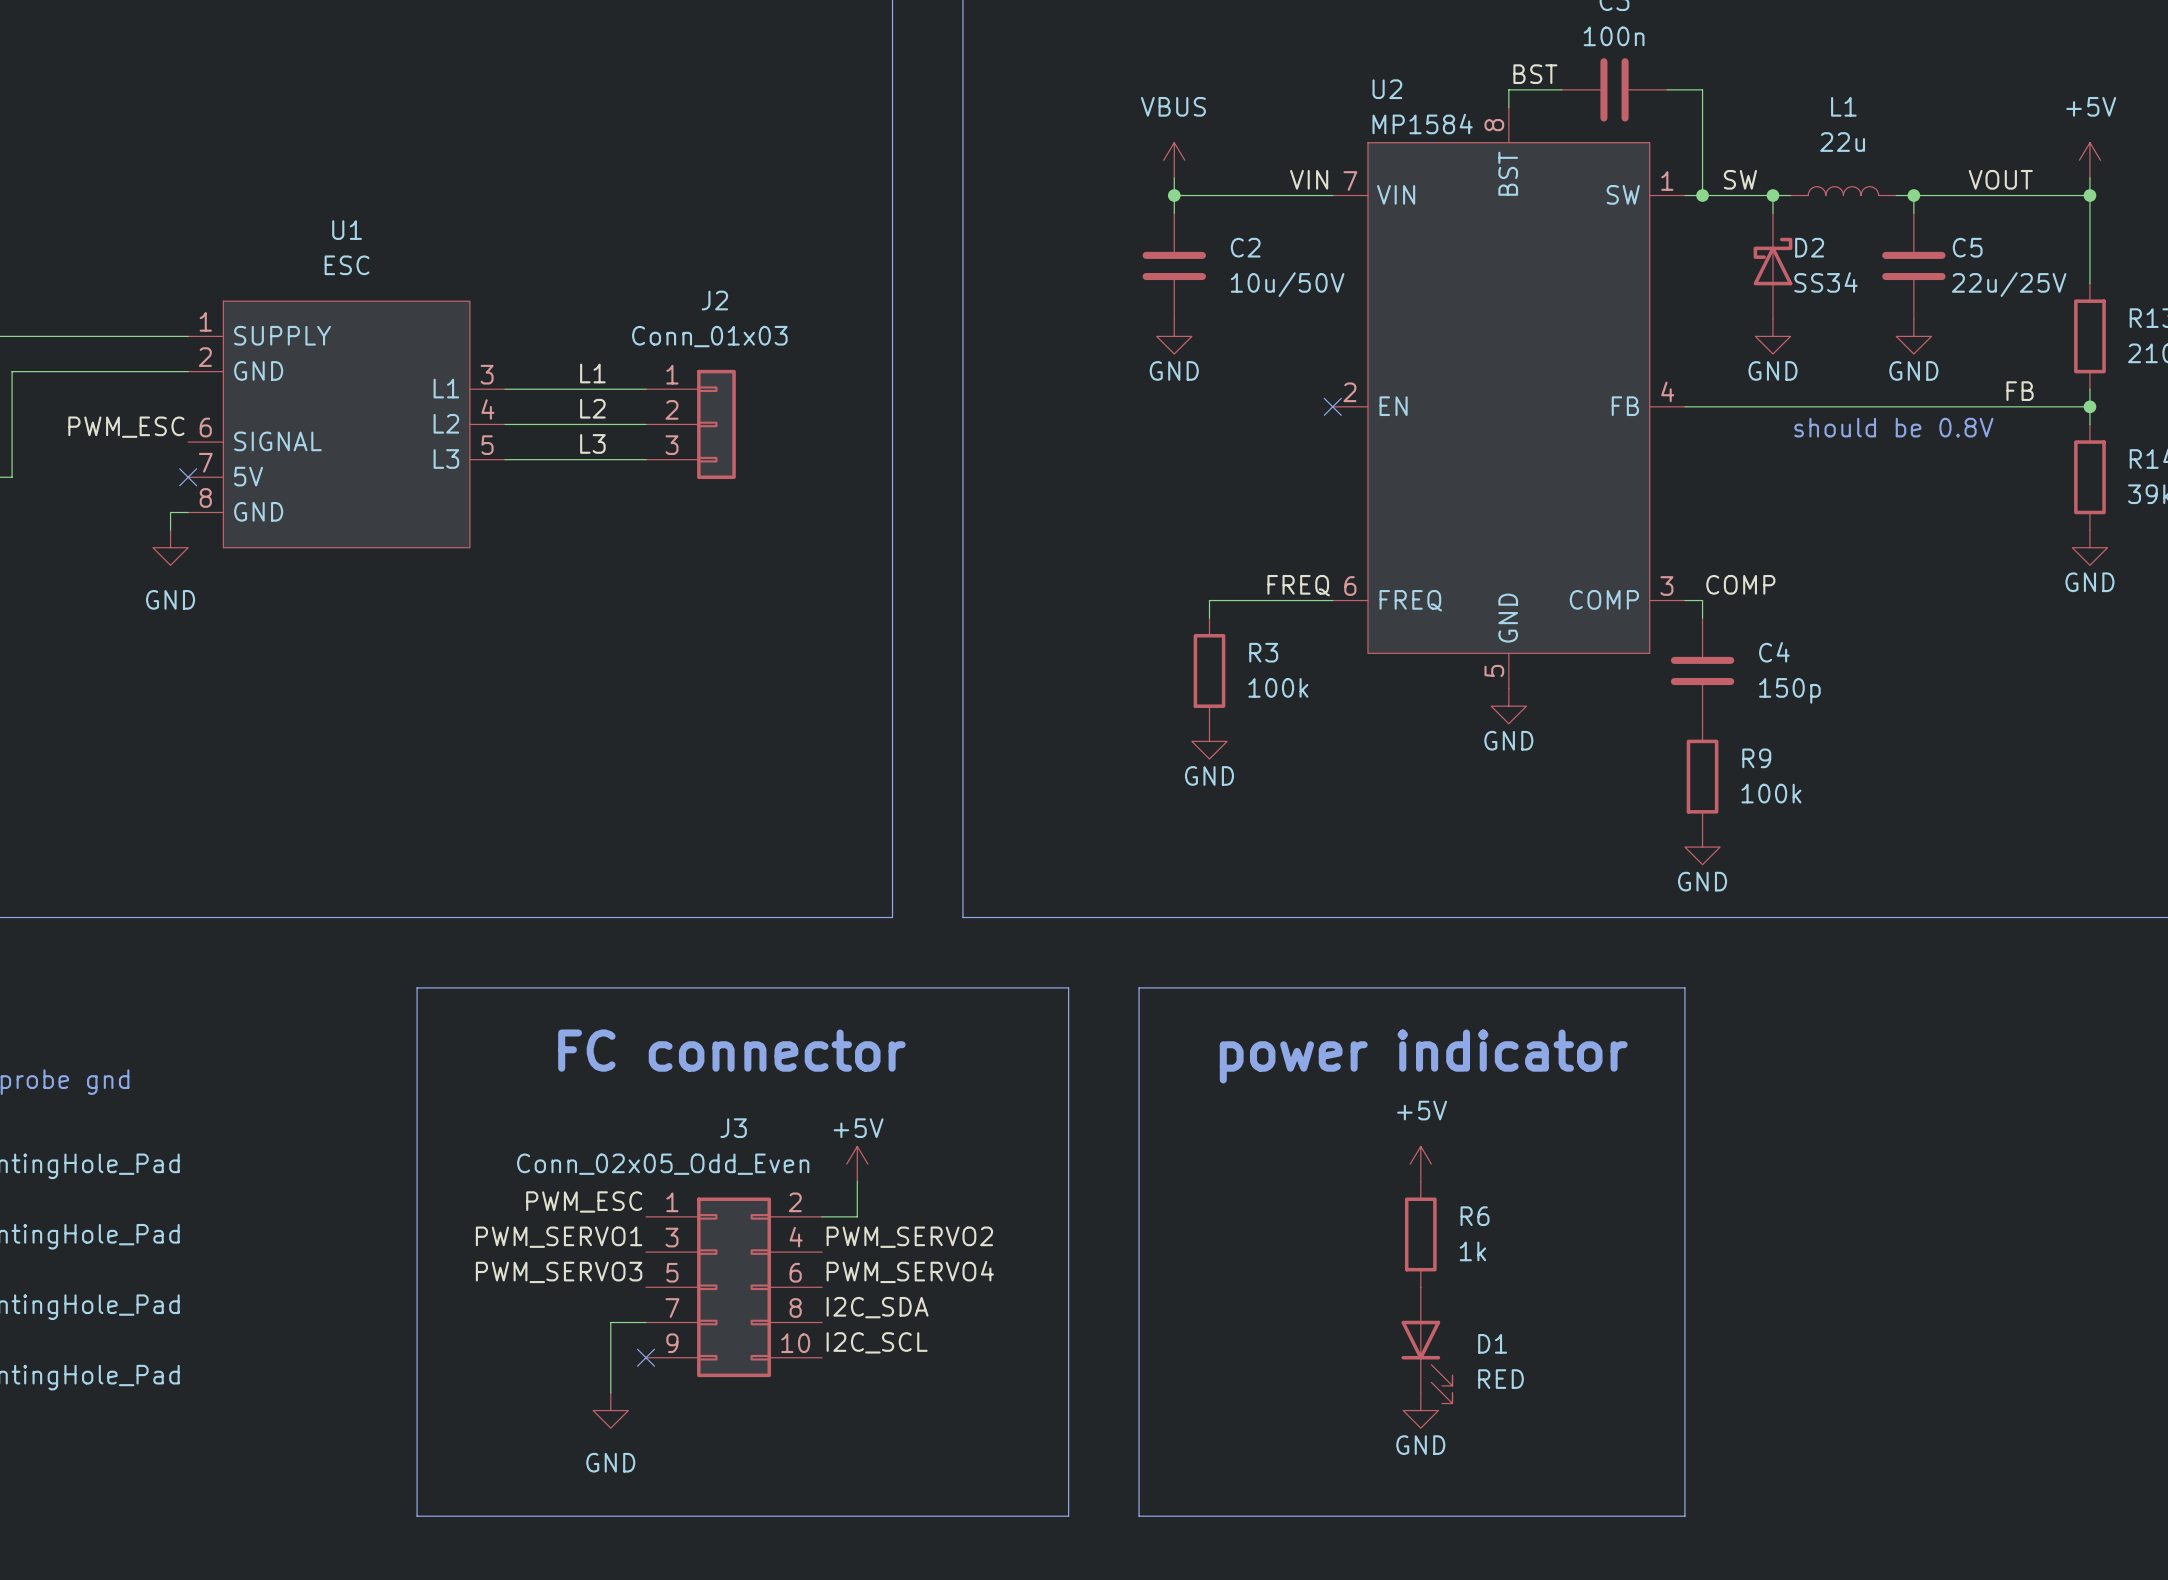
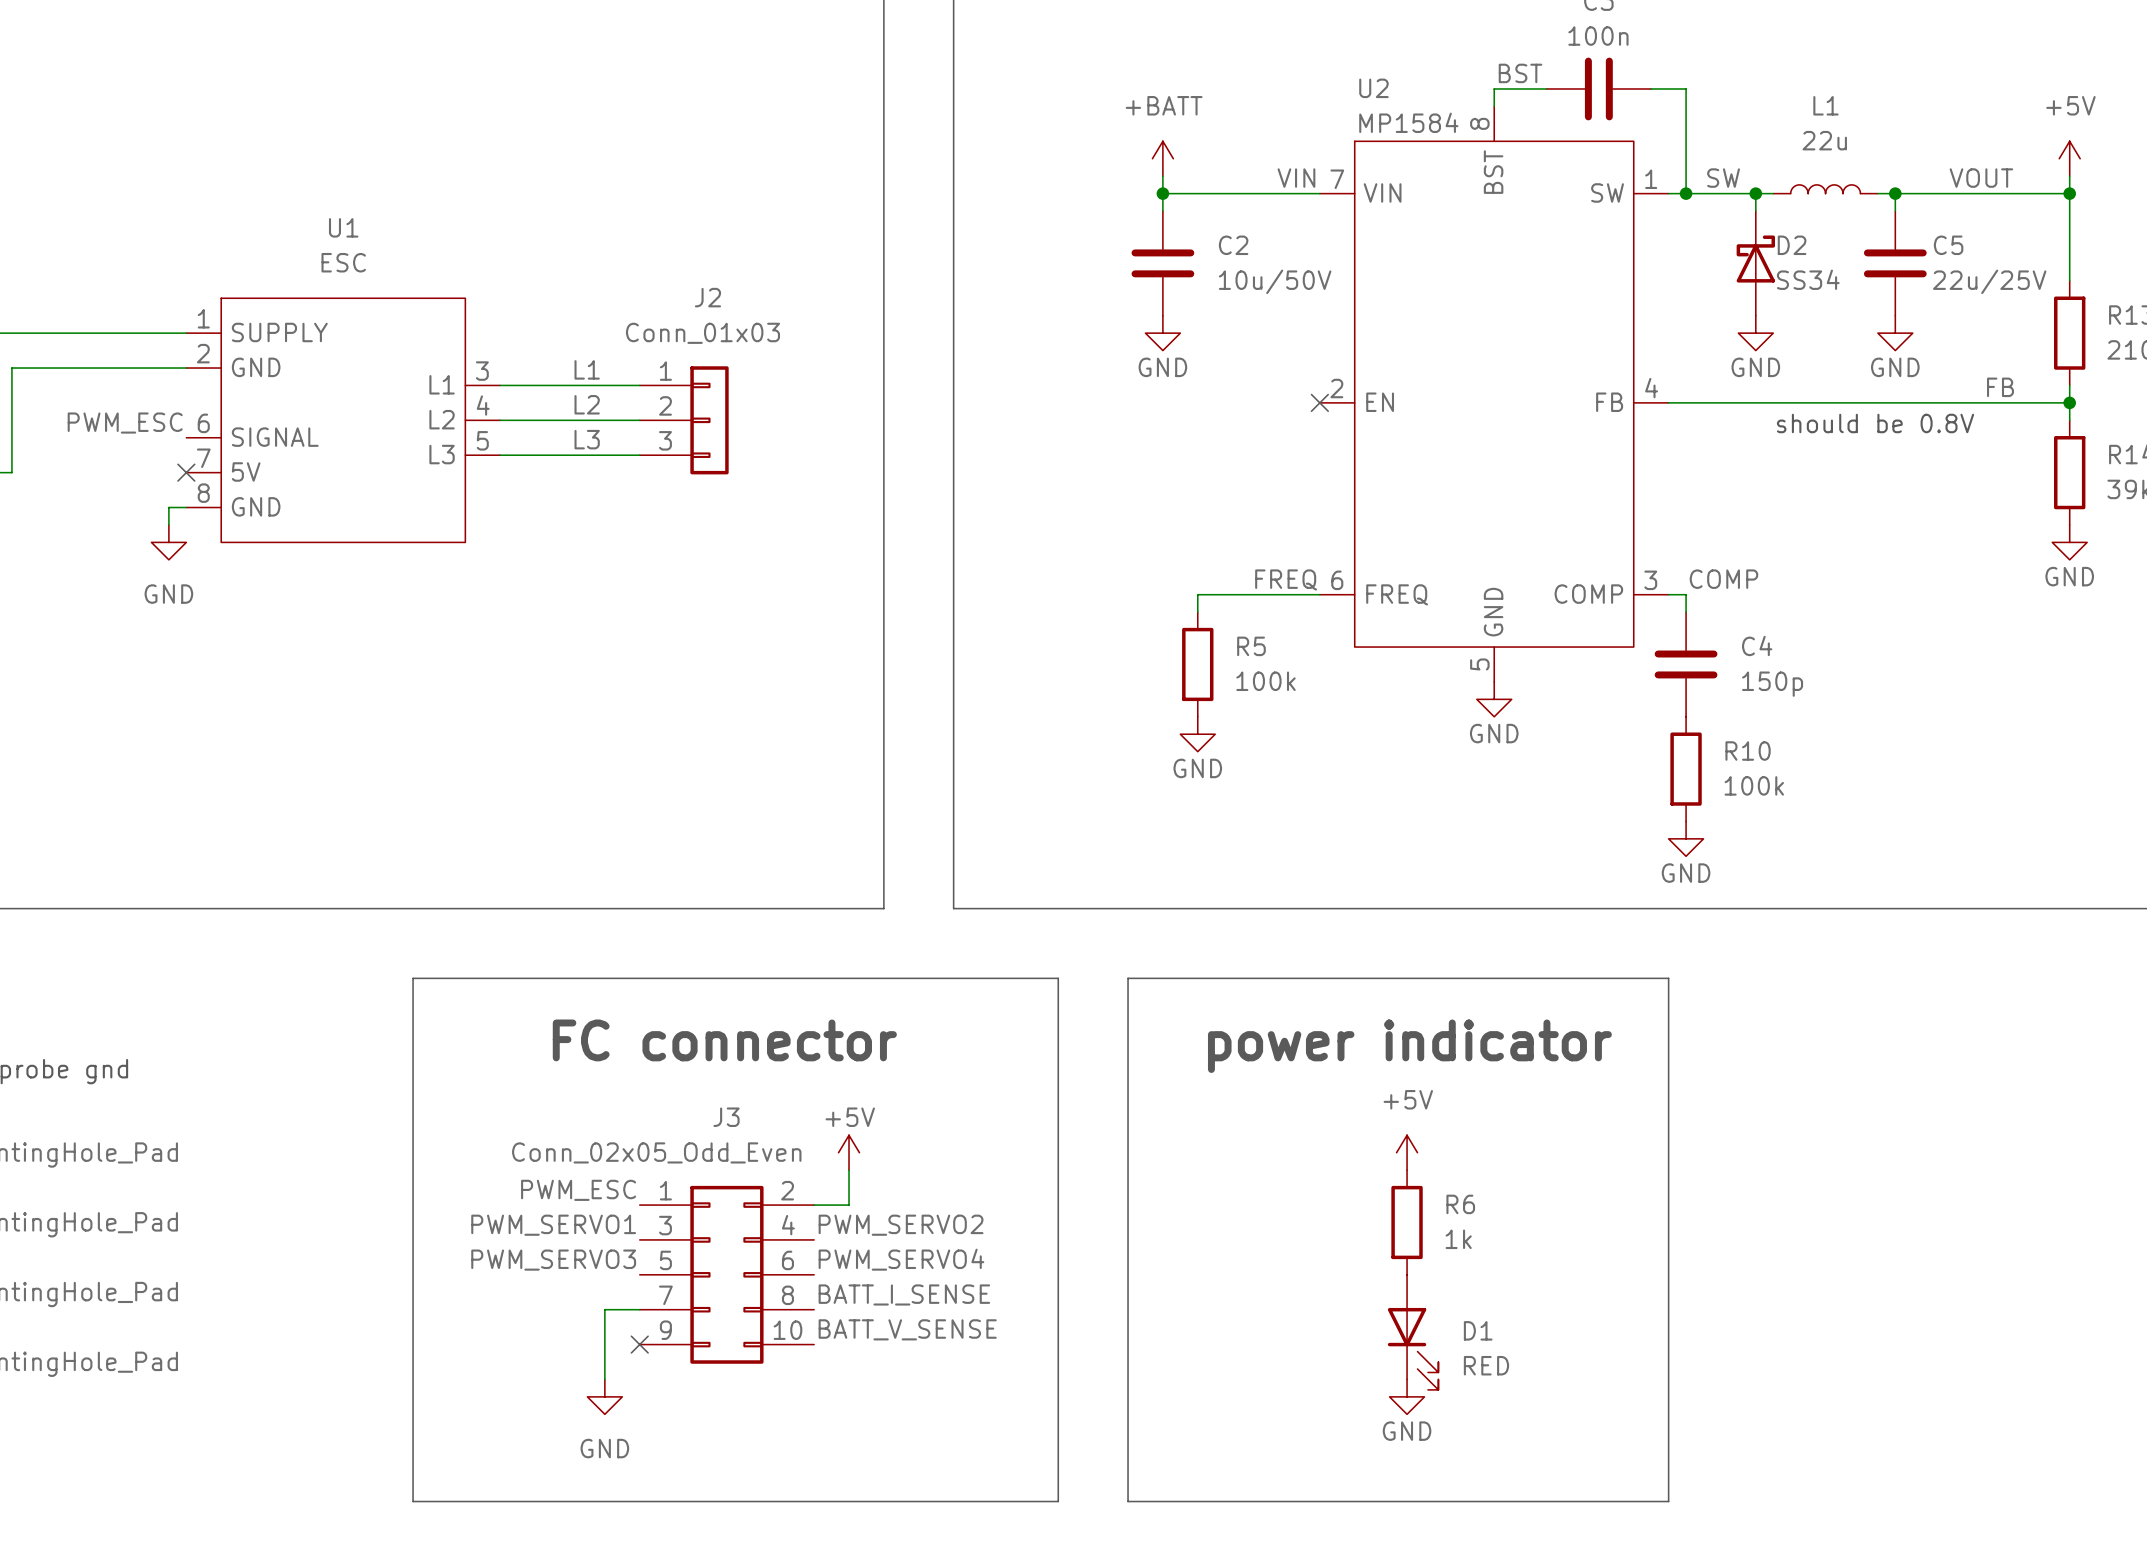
power symbol: VBUS (1174, 160) -> +BATT (1162, 158)
R3 name: R3 (1263, 652) -> R5 (1251, 646)
R9 name: R9 (1756, 758) -> R10 (1748, 751)
label: I2C_SDA (877, 1307) -> BATT_I_SENSE (904, 1294)
label: I2C_SCL (877, 1342) -> BATT_V_SENSE (907, 1329)

